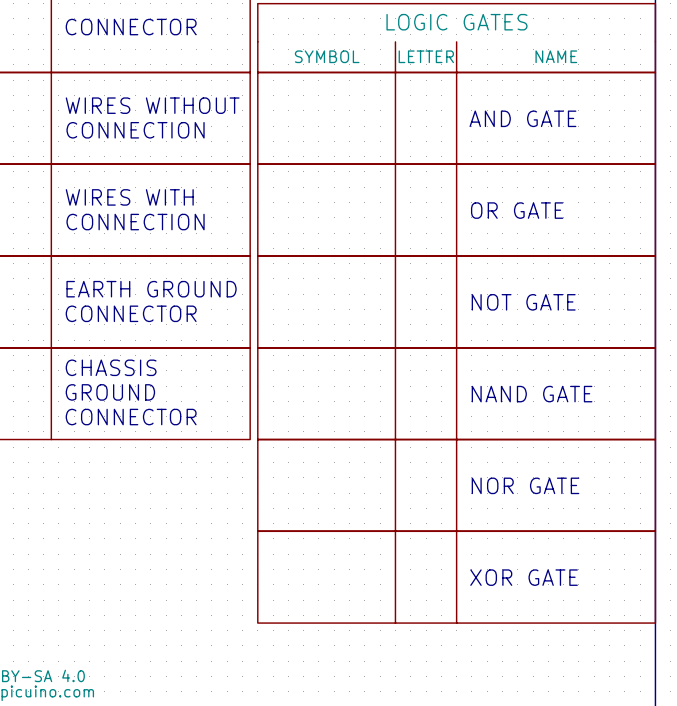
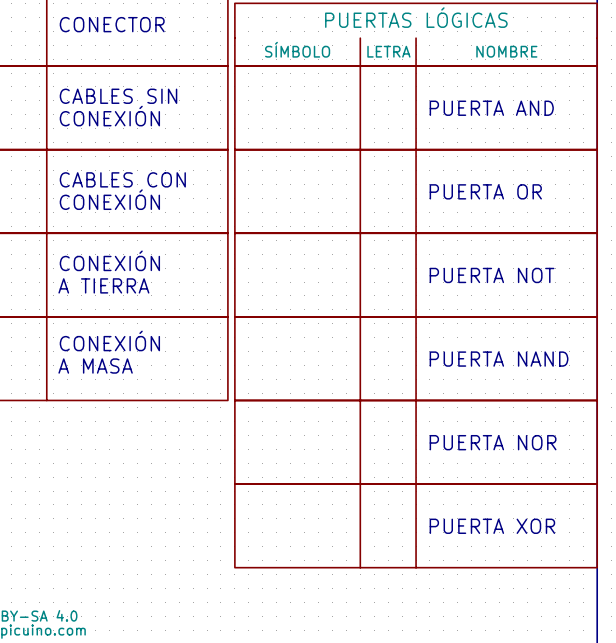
part text: LOGIC GATES (456, 22) -> PUERTAS LÓGICAS (416, 17)
text: CONNECTOR (131, 27) -> CONECTOR (112, 24)
part text: SYMBOL (327, 56) -> SÍMBOLO (297, 49)
part text: LETTER (426, 56) -> LETRA (388, 51)
part text: NAME (556, 56) -> NOMBRE (506, 51)
text: WIRES WITHOUT (152, 105) -> CABLES SIN (118, 96)
text: AND GATE (522, 118) -> PUERTA AND (491, 108)
text: CONNECTION (135, 130) -> CONEXIÓN (109, 116)
text: WIRES WITH (129, 197) -> CABLES CON (122, 179)
text: OR GATE (517, 210) -> PUERTA OR (485, 191)
text: CONNECTION (135, 222) -> CONEXIÓN (109, 199)
text: EARTH GROUND (151, 289) -> CONEXIÓN (109, 260)
text: NOT GATE (523, 302) -> PUERTA NOT (492, 275)
text: CONNECTOR (131, 313) -> A TIERRA (103, 285)
text: CHASSIS (111, 367) -> none
text: none -> CONEXIÓN (109, 340)
text: GROUND (110, 392) -> none
text: NAND GATE (532, 394) -> PUERTA NAND (499, 359)
text: none -> A MASA (95, 366)
text: CONNECTOR (131, 417) -> none
text: NOR GATE (525, 485) -> PUERTA NOR (493, 442)
text: XOR GATE (524, 577) -> PUERTA XOR (492, 526)

